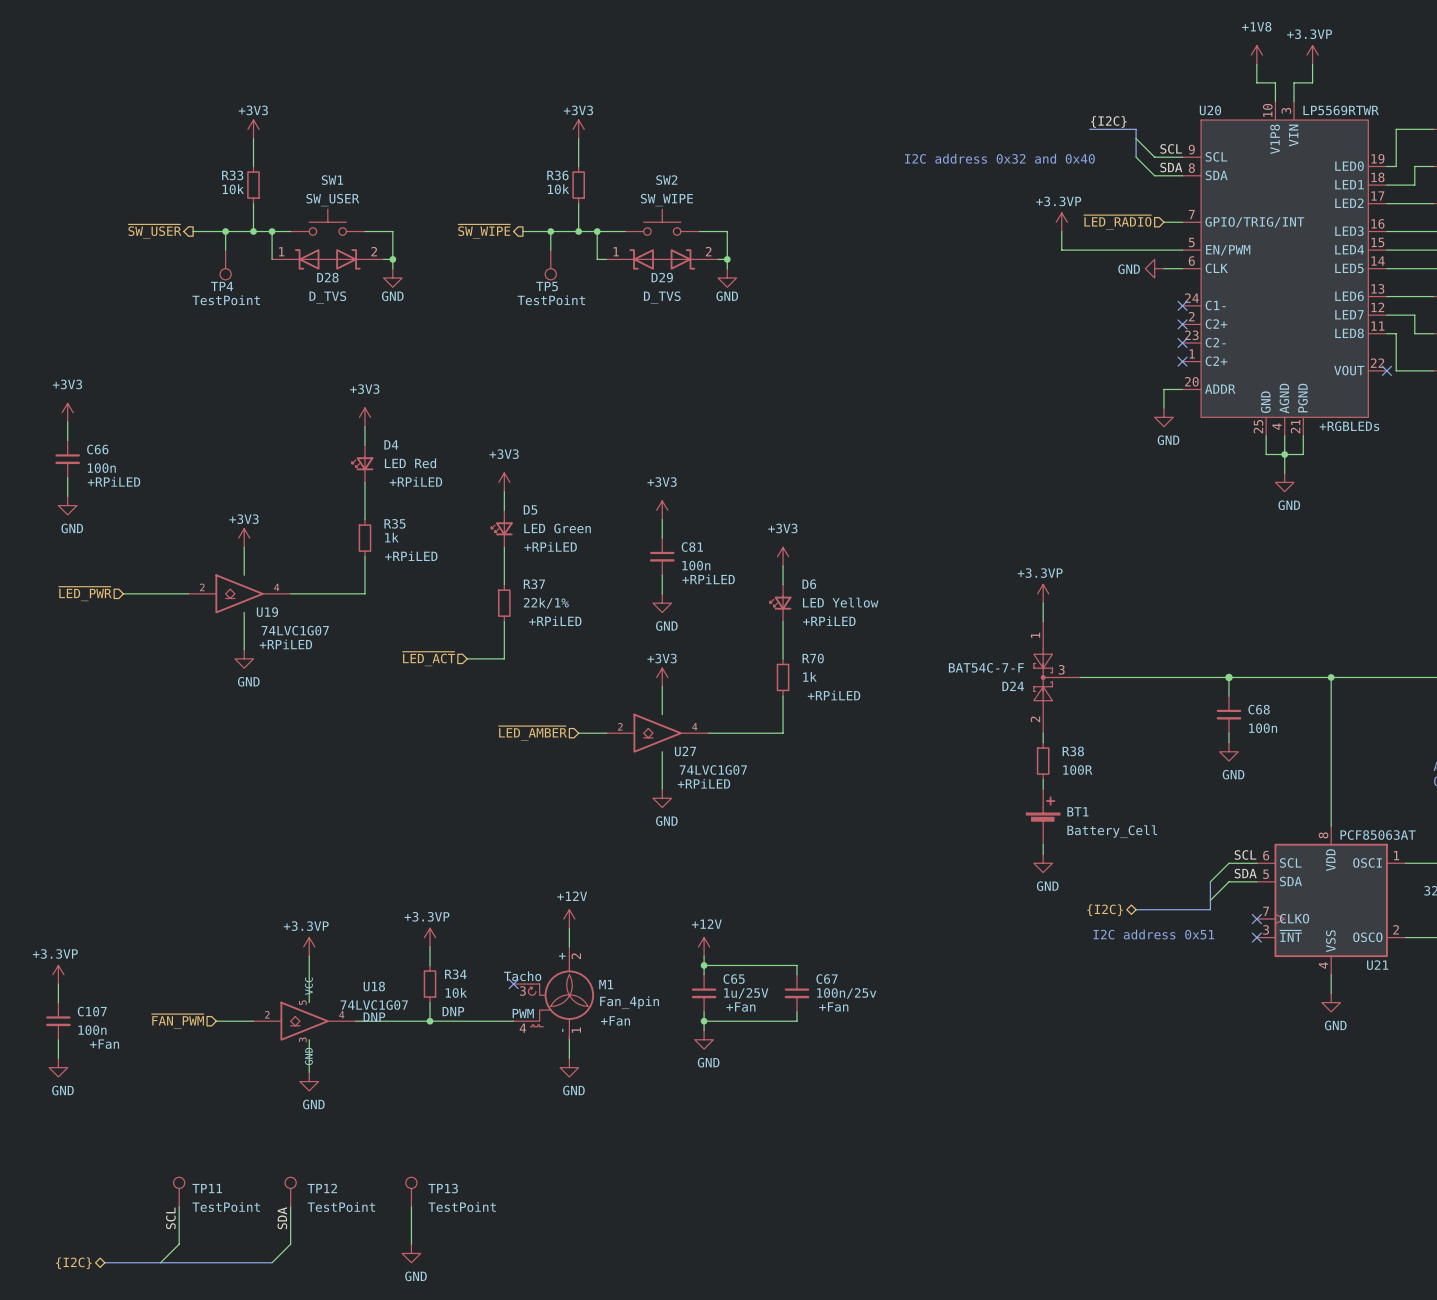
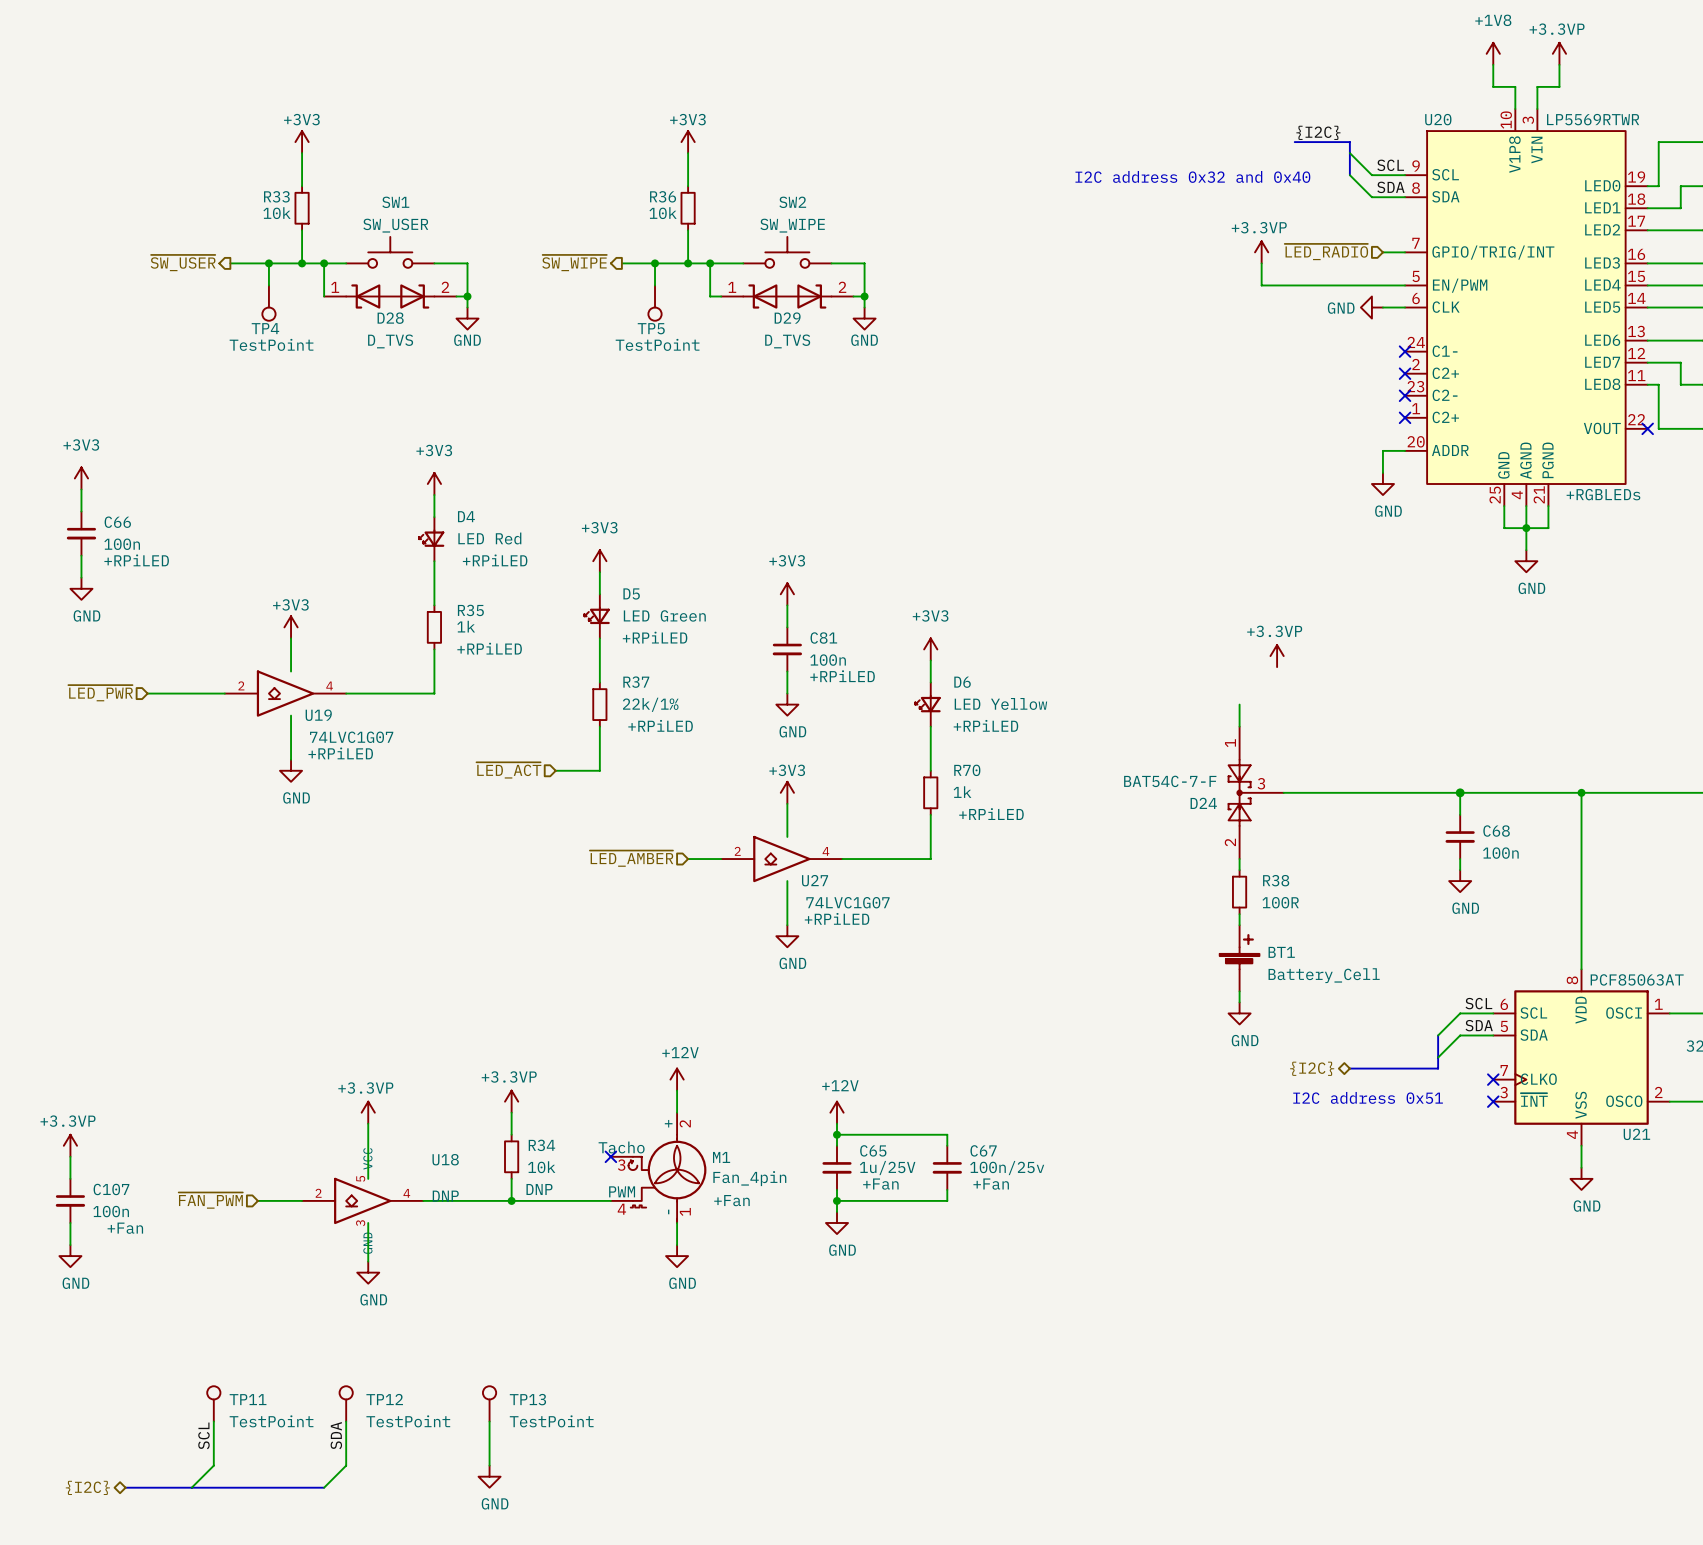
power symbol position: +3.3VP (1043, 593) -> +3.3VP (1277, 656)
U18 value: 74LVC1G07 (374, 1005) -> none

